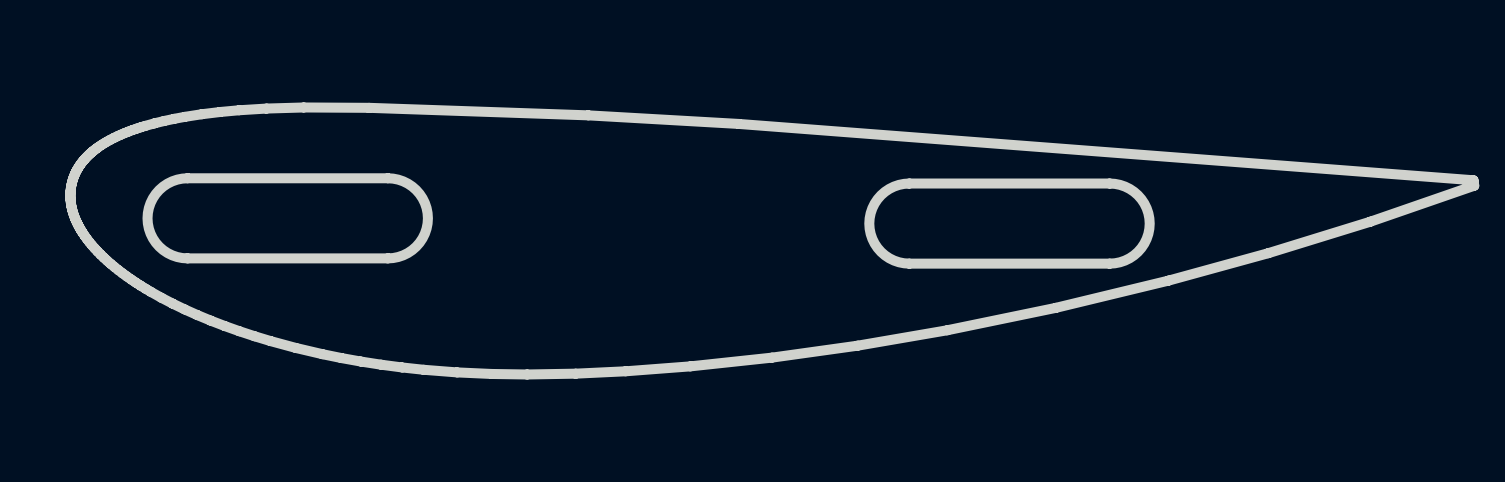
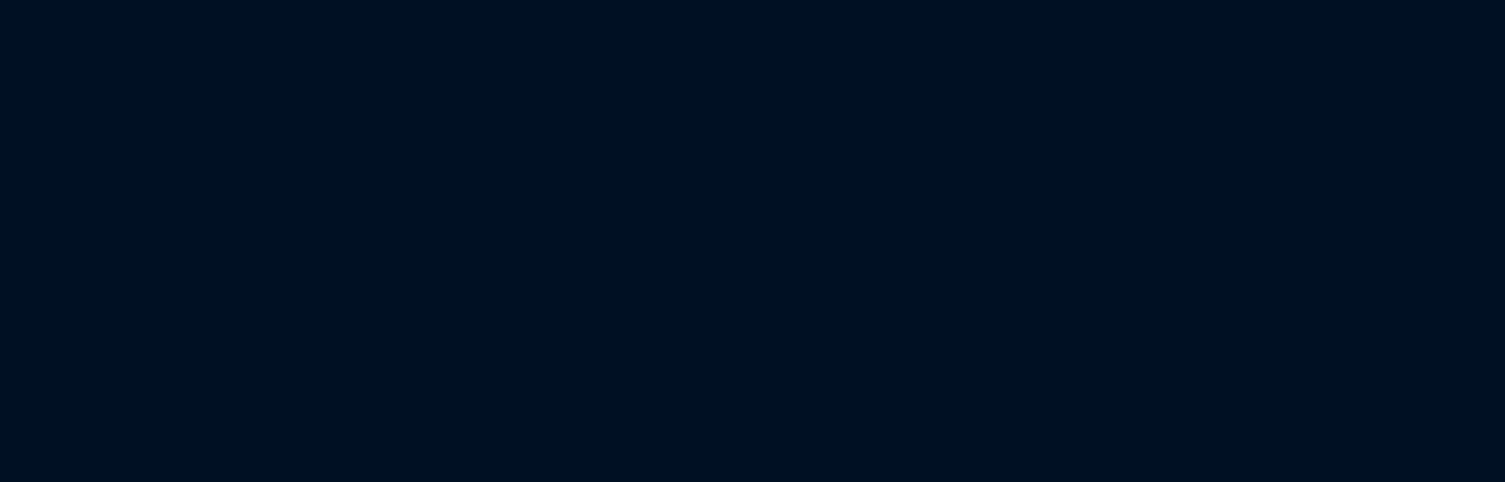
board edge: (303, 107) (239, 110) (184, 116) (140, 127) (110, 139) (86, 156) (73, 177) (70, 201) (78, 225) (89, 242) (103, 257) (145, 288) (197, 315) (270, 341) (341, 358) (423, 369) (491, 373) (575, 373) (690, 366) (771, 357) (947, 330) (1055, 307) (1168, 280) (1268, 253) (1370, 221) (1474, 185) (1473, 180) (738, 123) (588, 115) (303, 107) -> none
board edge: (187, 178) (398, 179) (412, 186) (422, 198) (427, 213) (426, 228) (422, 238) (412, 250) (393, 258) (177, 257) (167, 253) (155, 242) (148, 228) (147, 213) (152, 198) (159, 190) (172, 181) (187, 178) -> none
board edge: (909, 183) (1120, 184) (1134, 191) (1144, 203) (1149, 218) (1148, 233) (1137, 251) (1129, 258) (1114, 263) (898, 262) (884, 255) (877, 247) (870, 233) (869, 218) (874, 203) (884, 191) (894, 186) (909, 183) -> none

